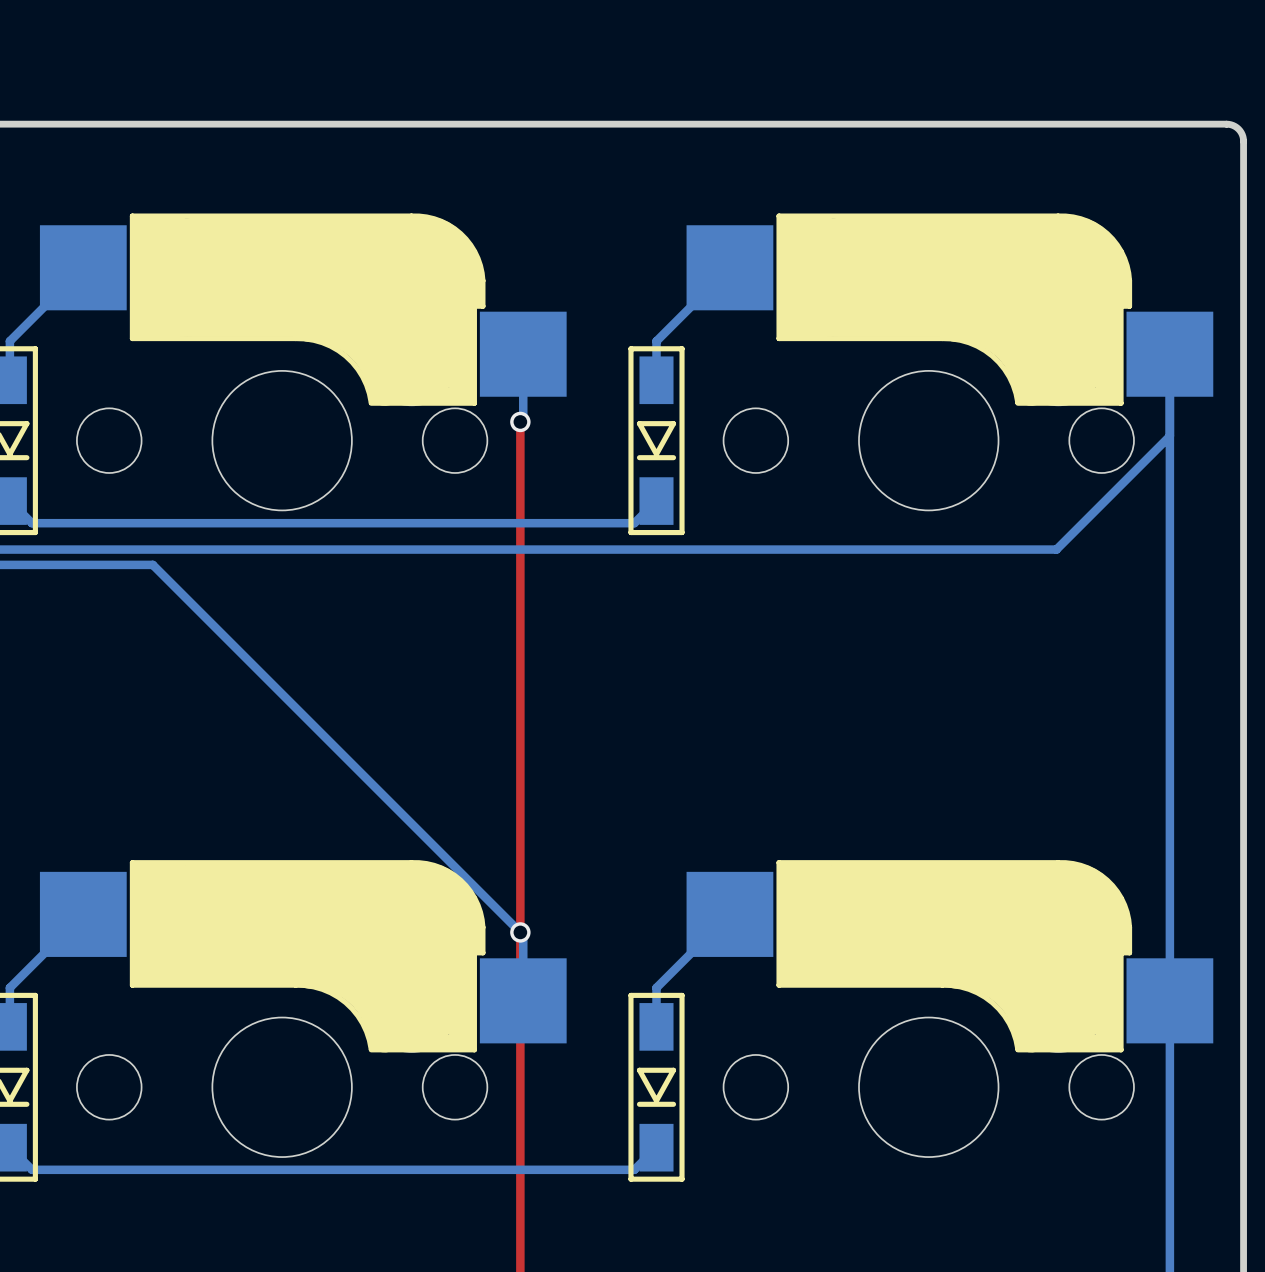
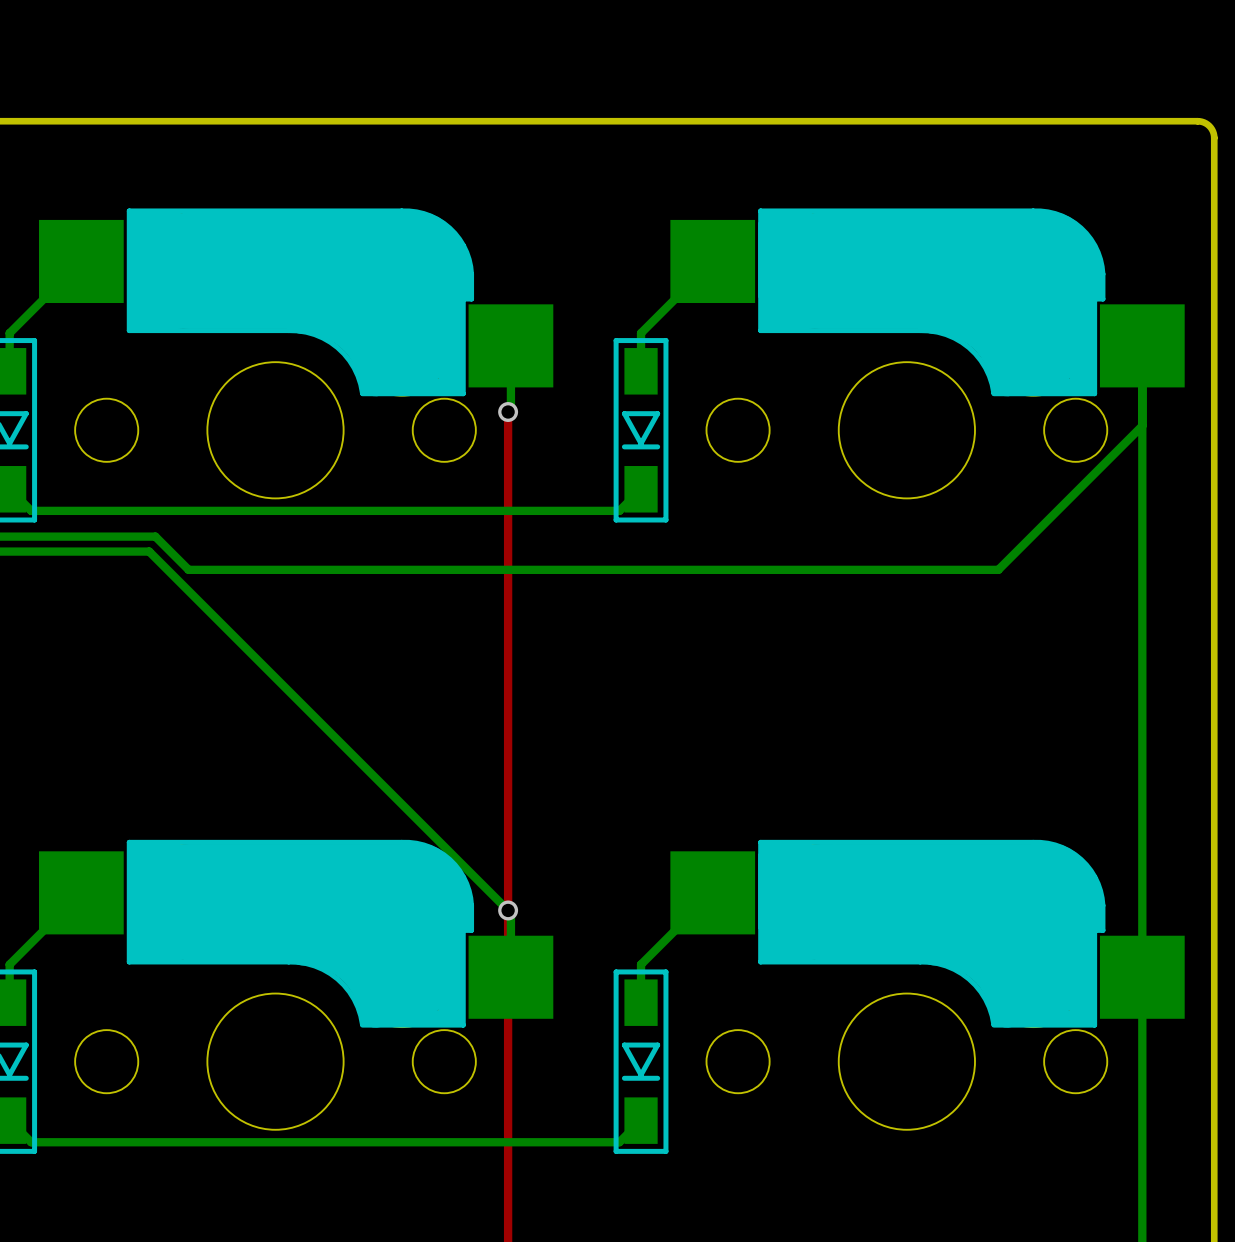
bottom track: (1056, 549) (159, 549) -> (1031, 536) (998, 569) (188, 569) (155, 536)

